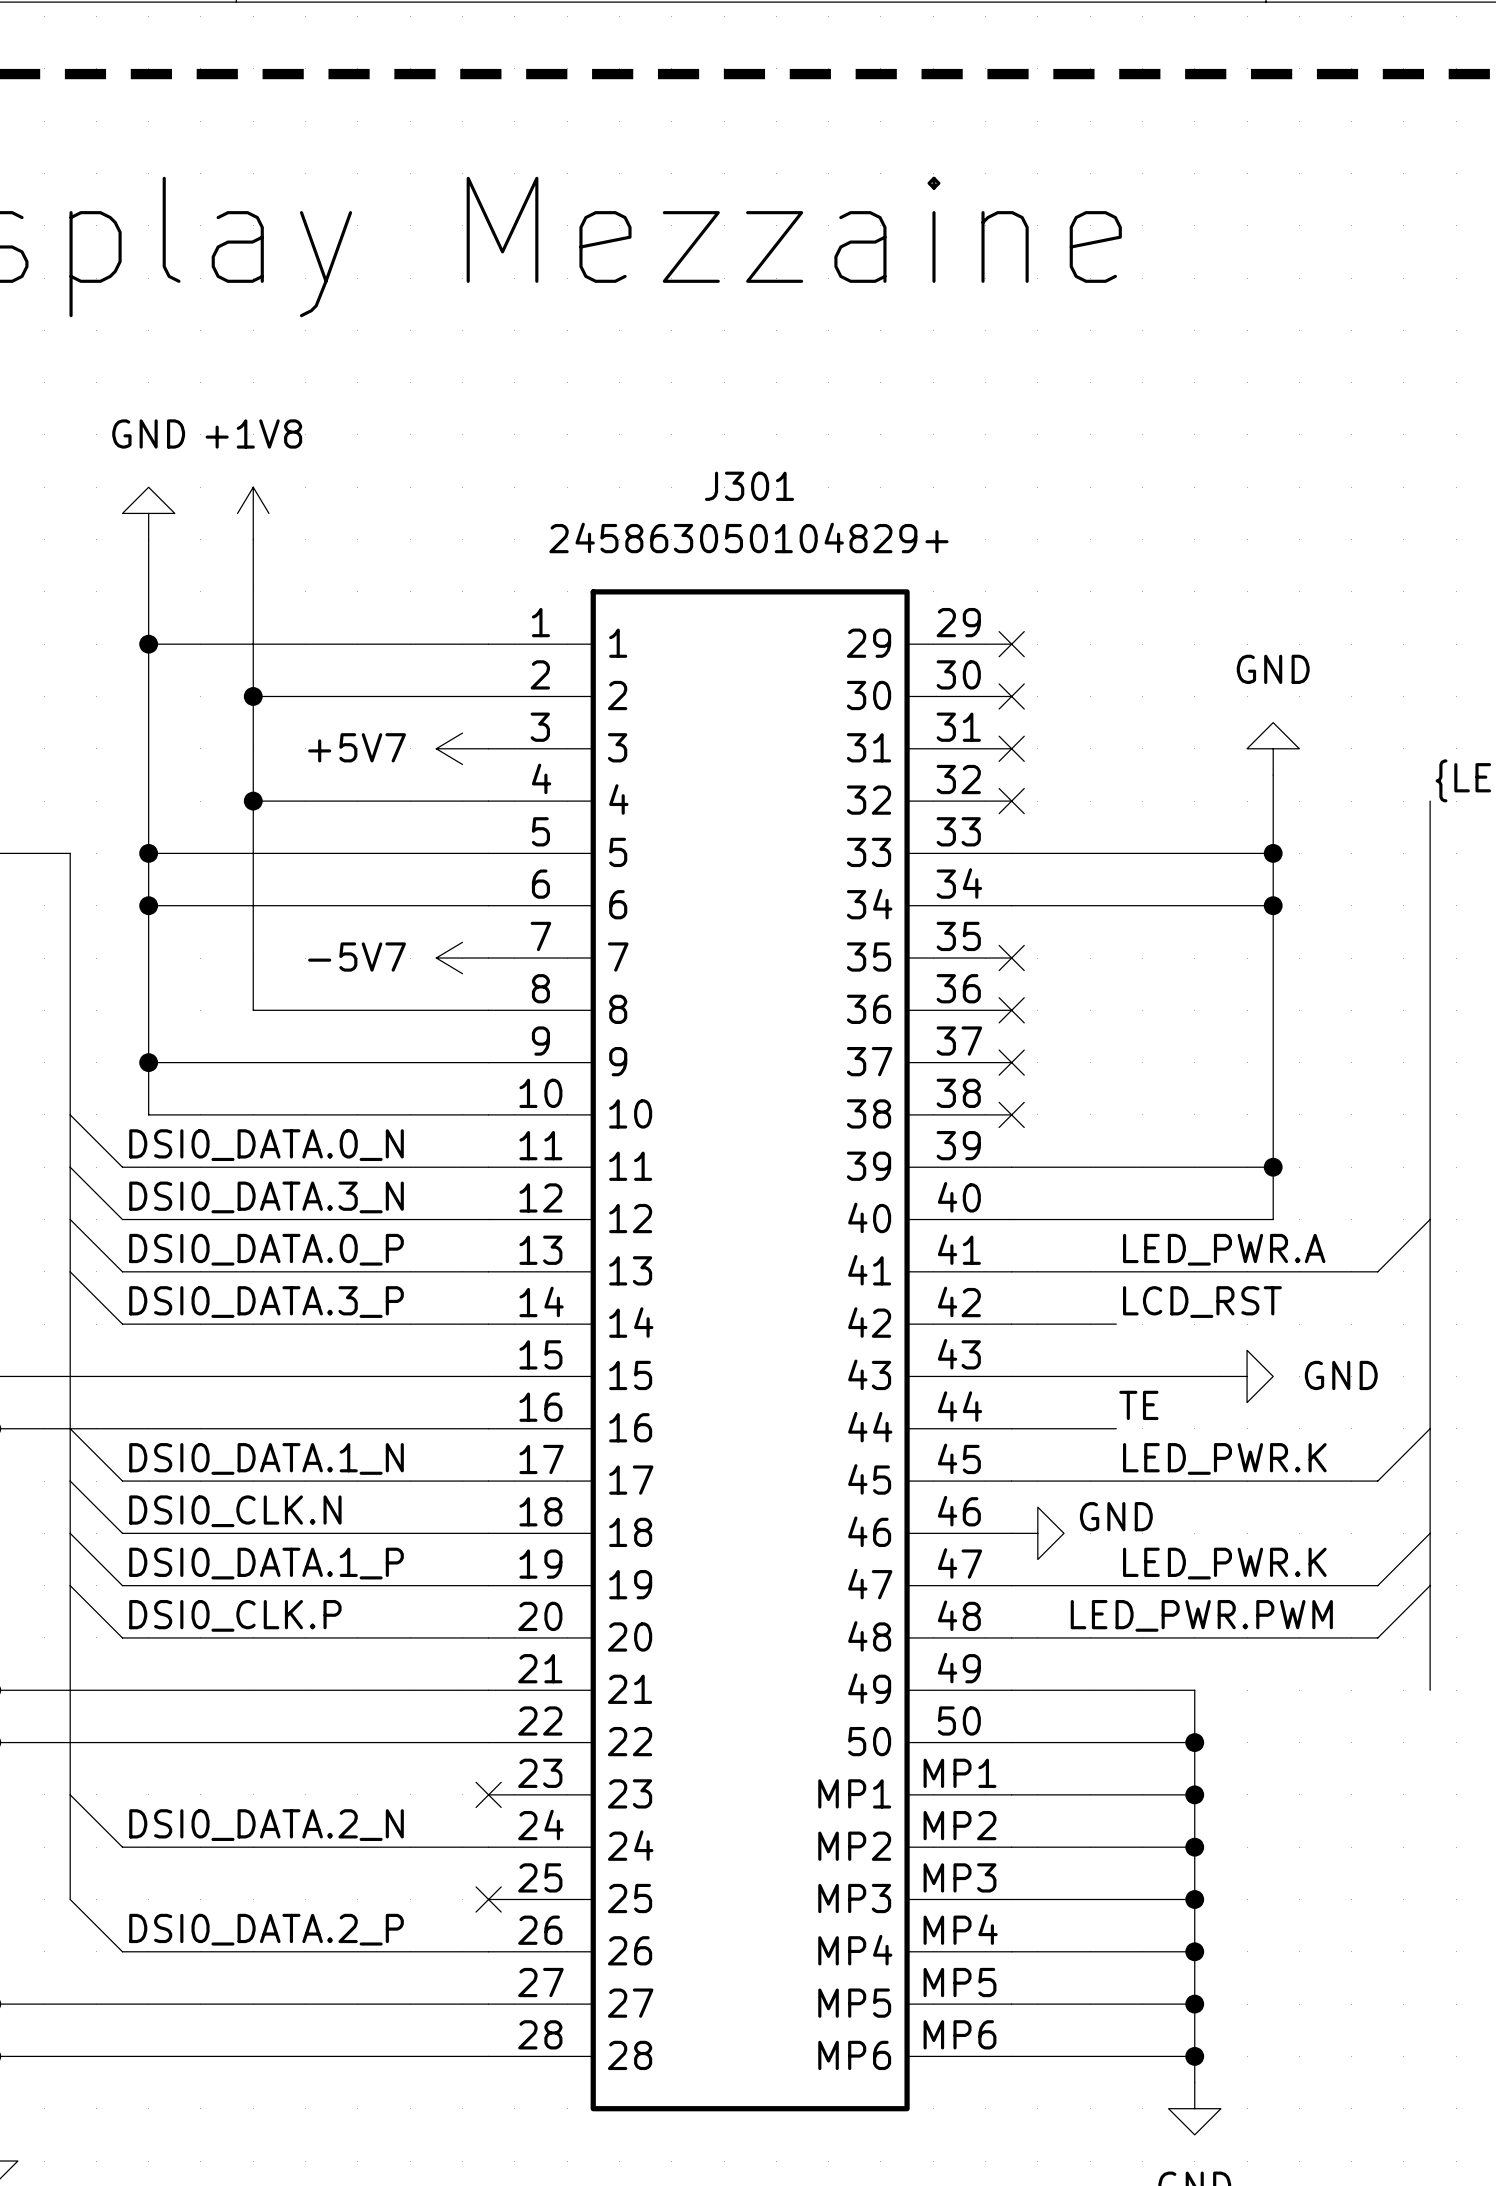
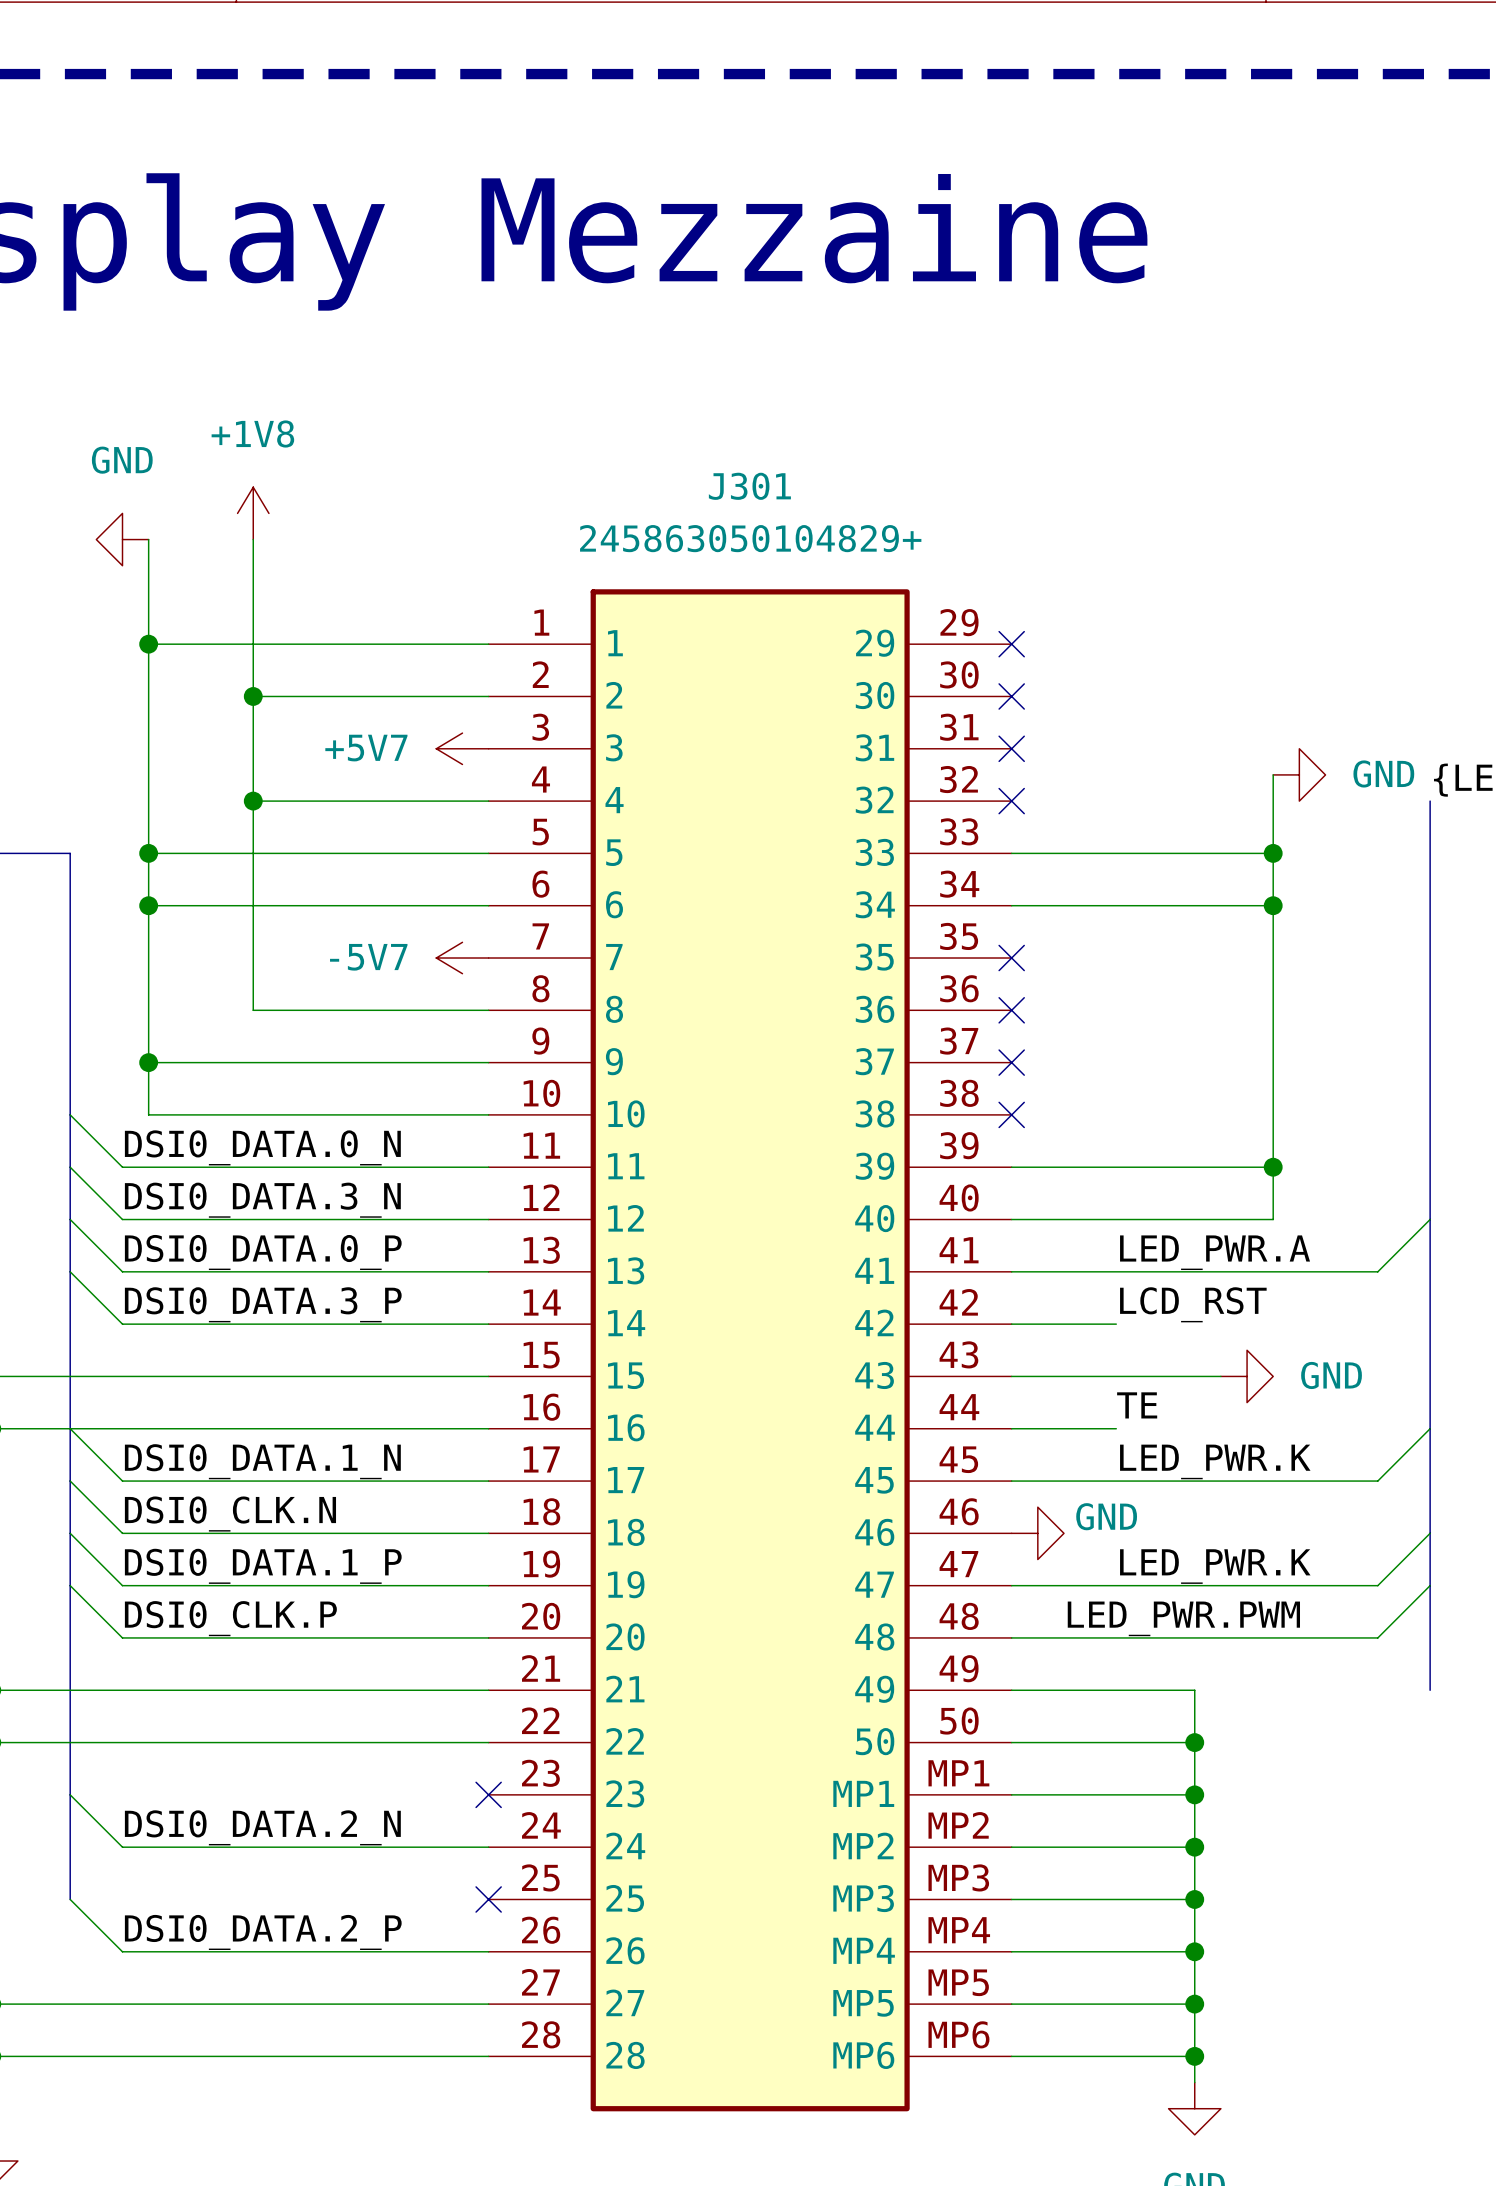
power symbol rotation: 0° (148, 513) -> 90° counterclockwise (122, 539)
power symbol position: GND (148, 513) -> GND (122, 539)
power symbol rotation: 0° (1273, 748) -> 90° clockwise (1299, 774)
power symbol position: GND (1273, 748) -> GND (1299, 774)

